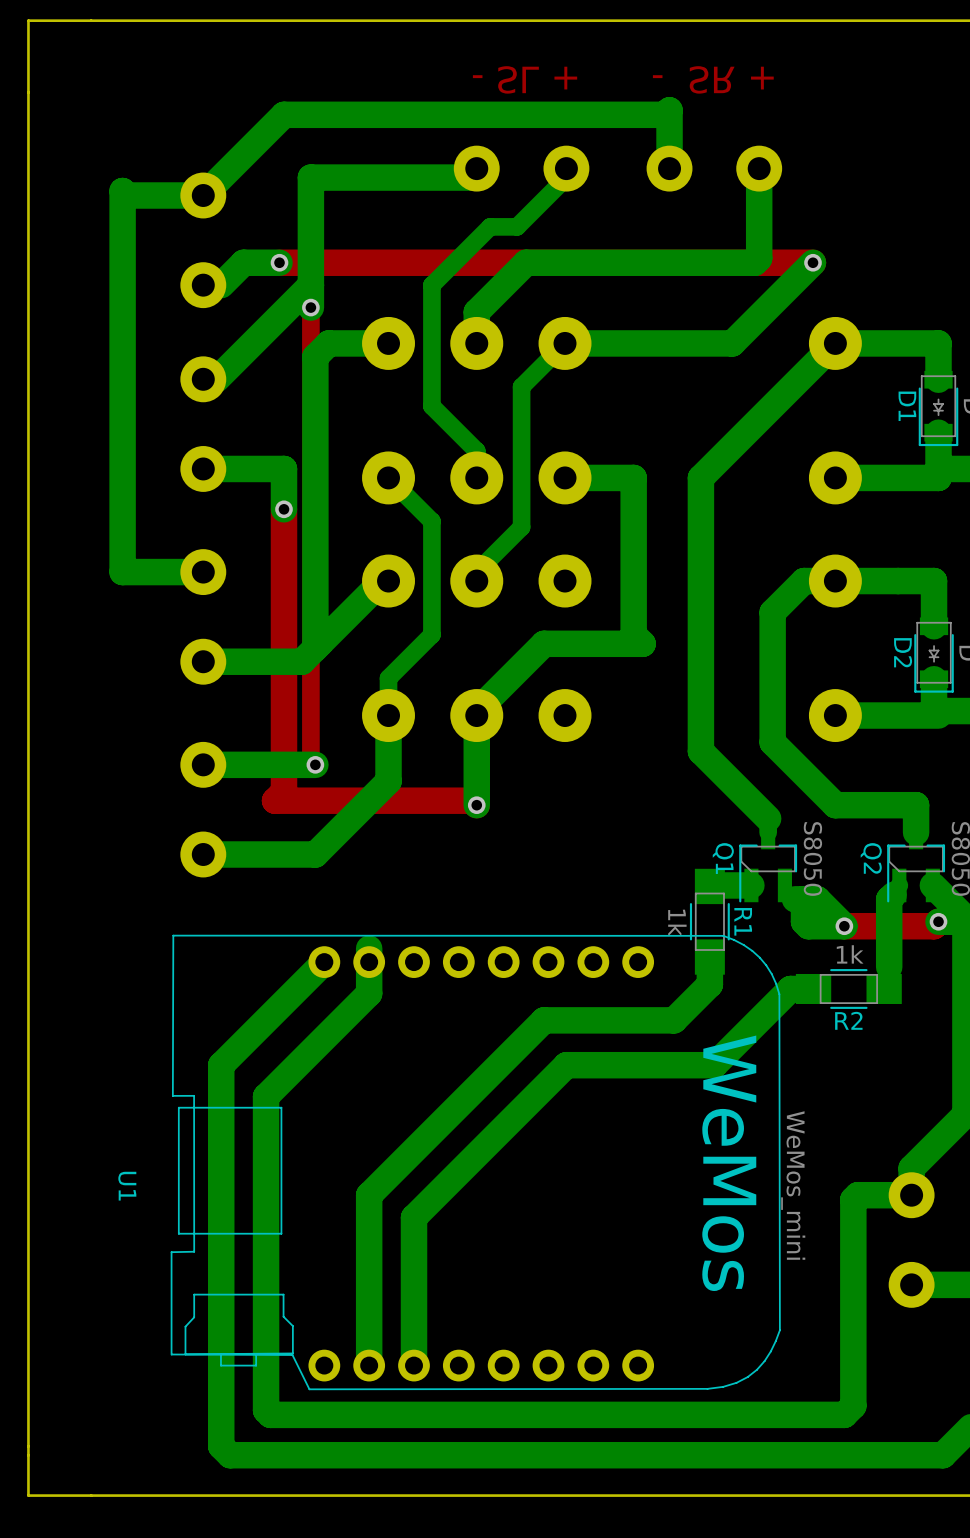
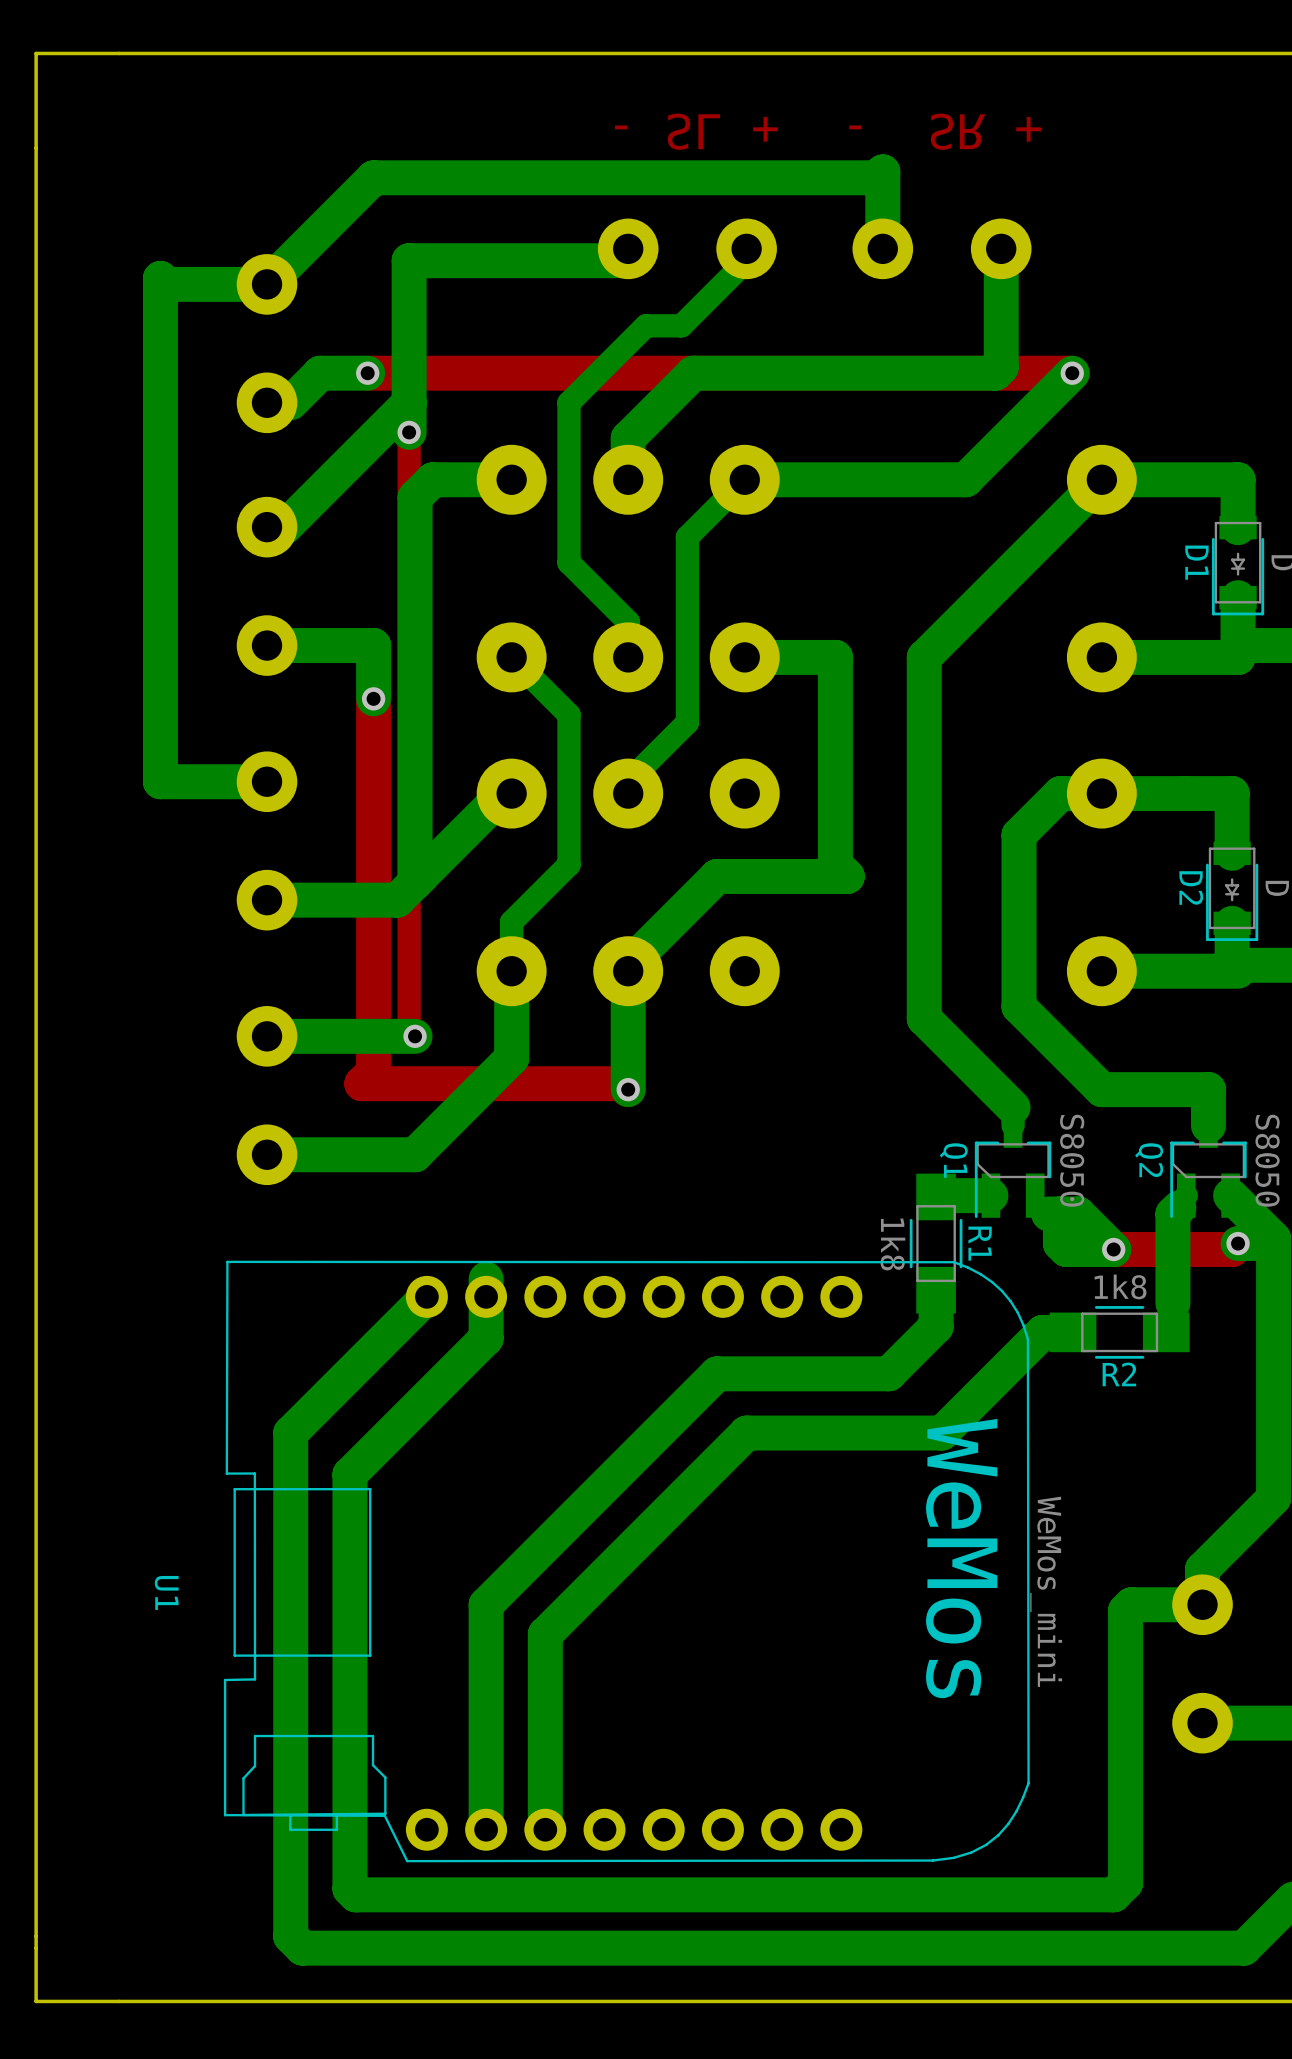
R1 value: 1k (677, 923) -> 1k8 (892, 1244)
R2 value: 1k (850, 954) -> 1k8 (1120, 1286)

